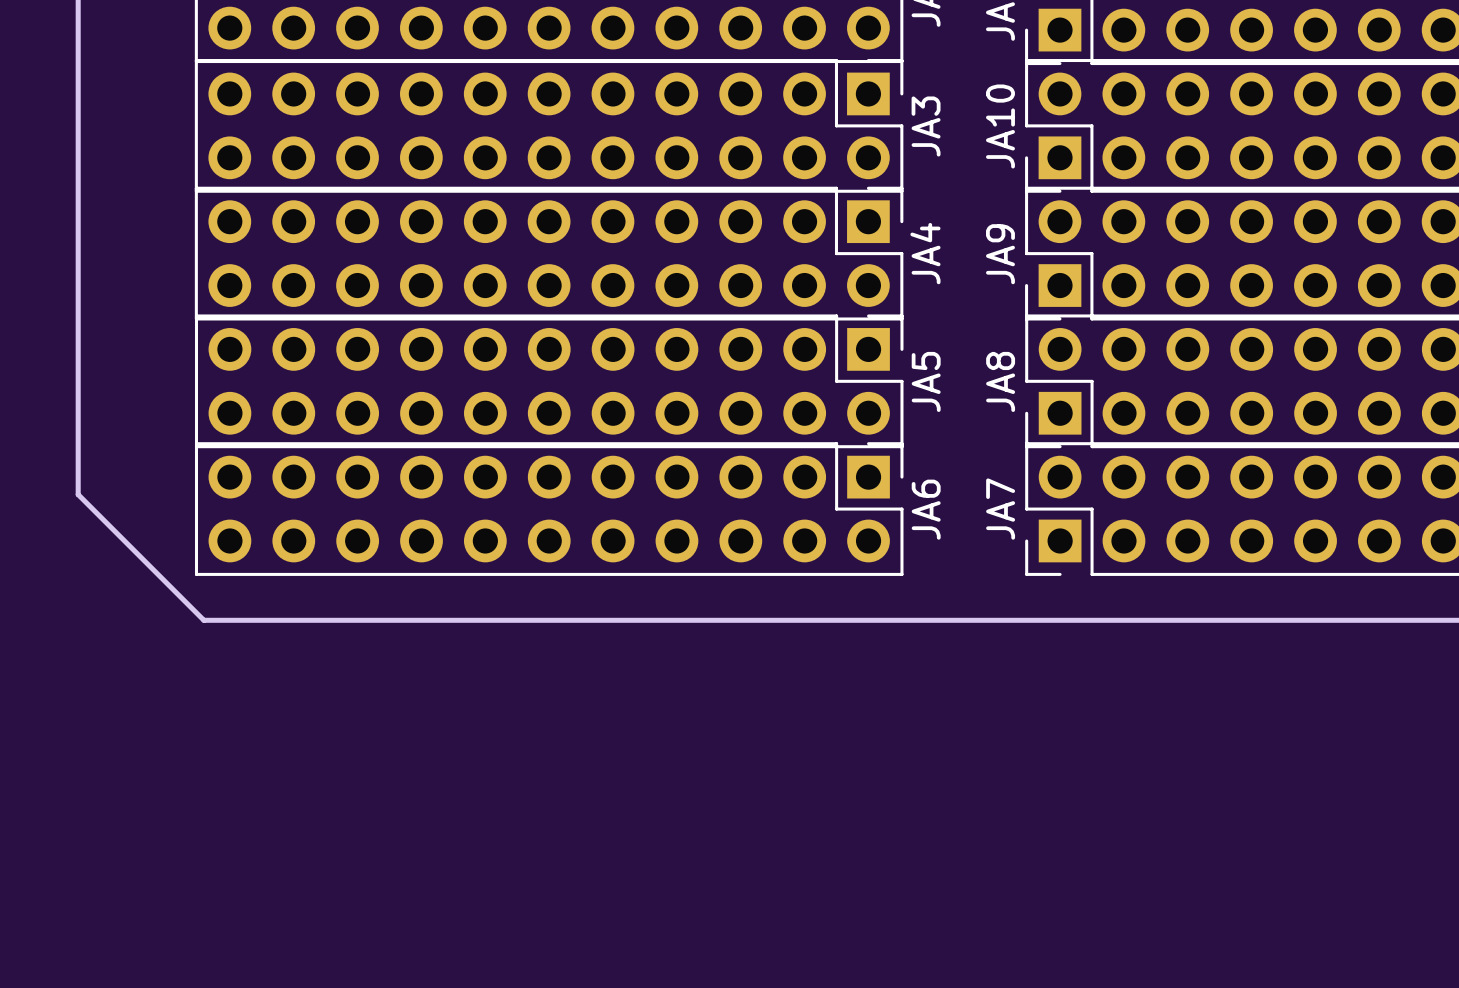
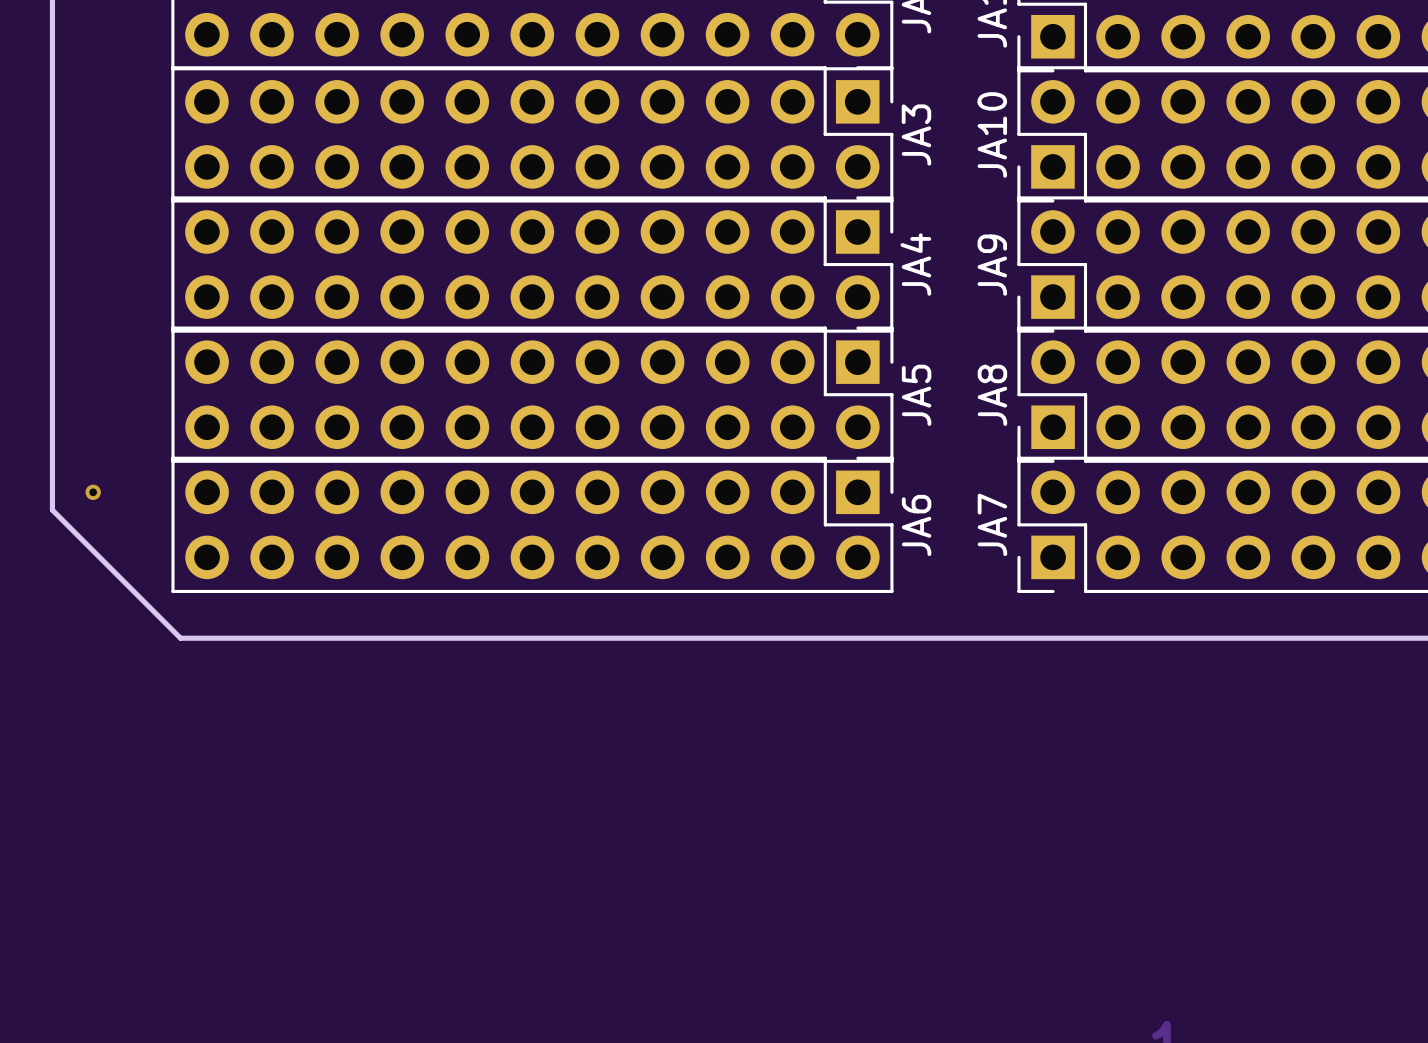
via: none -> (93, 492)

